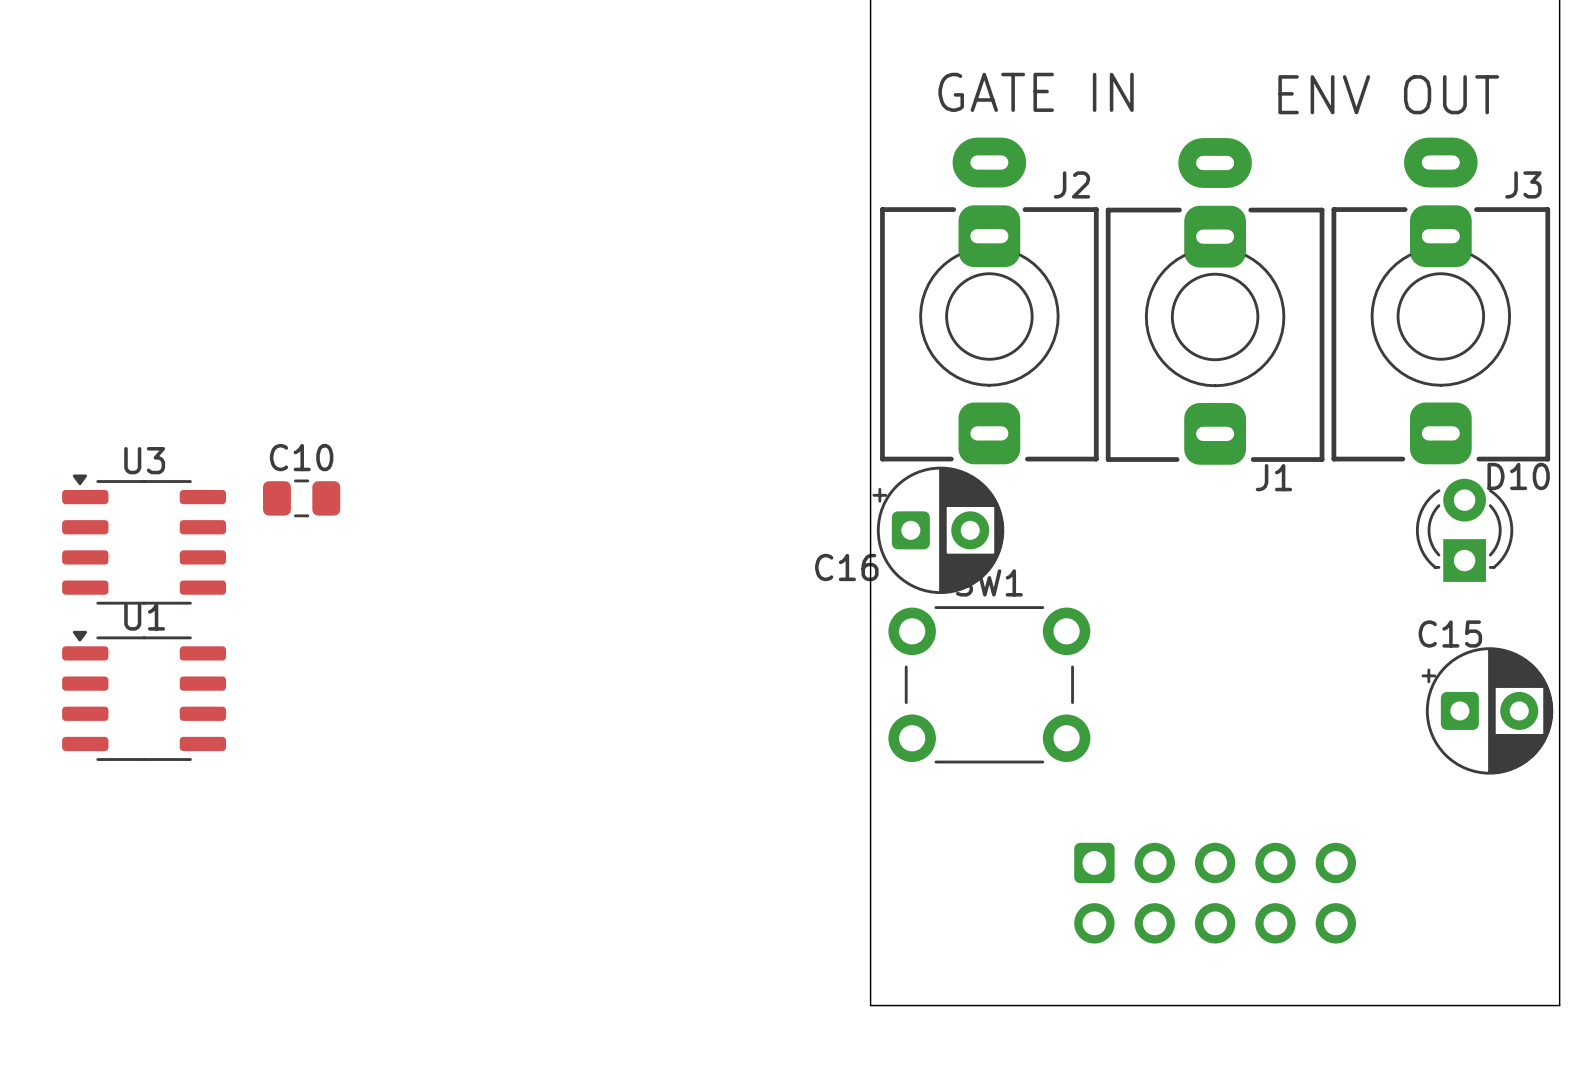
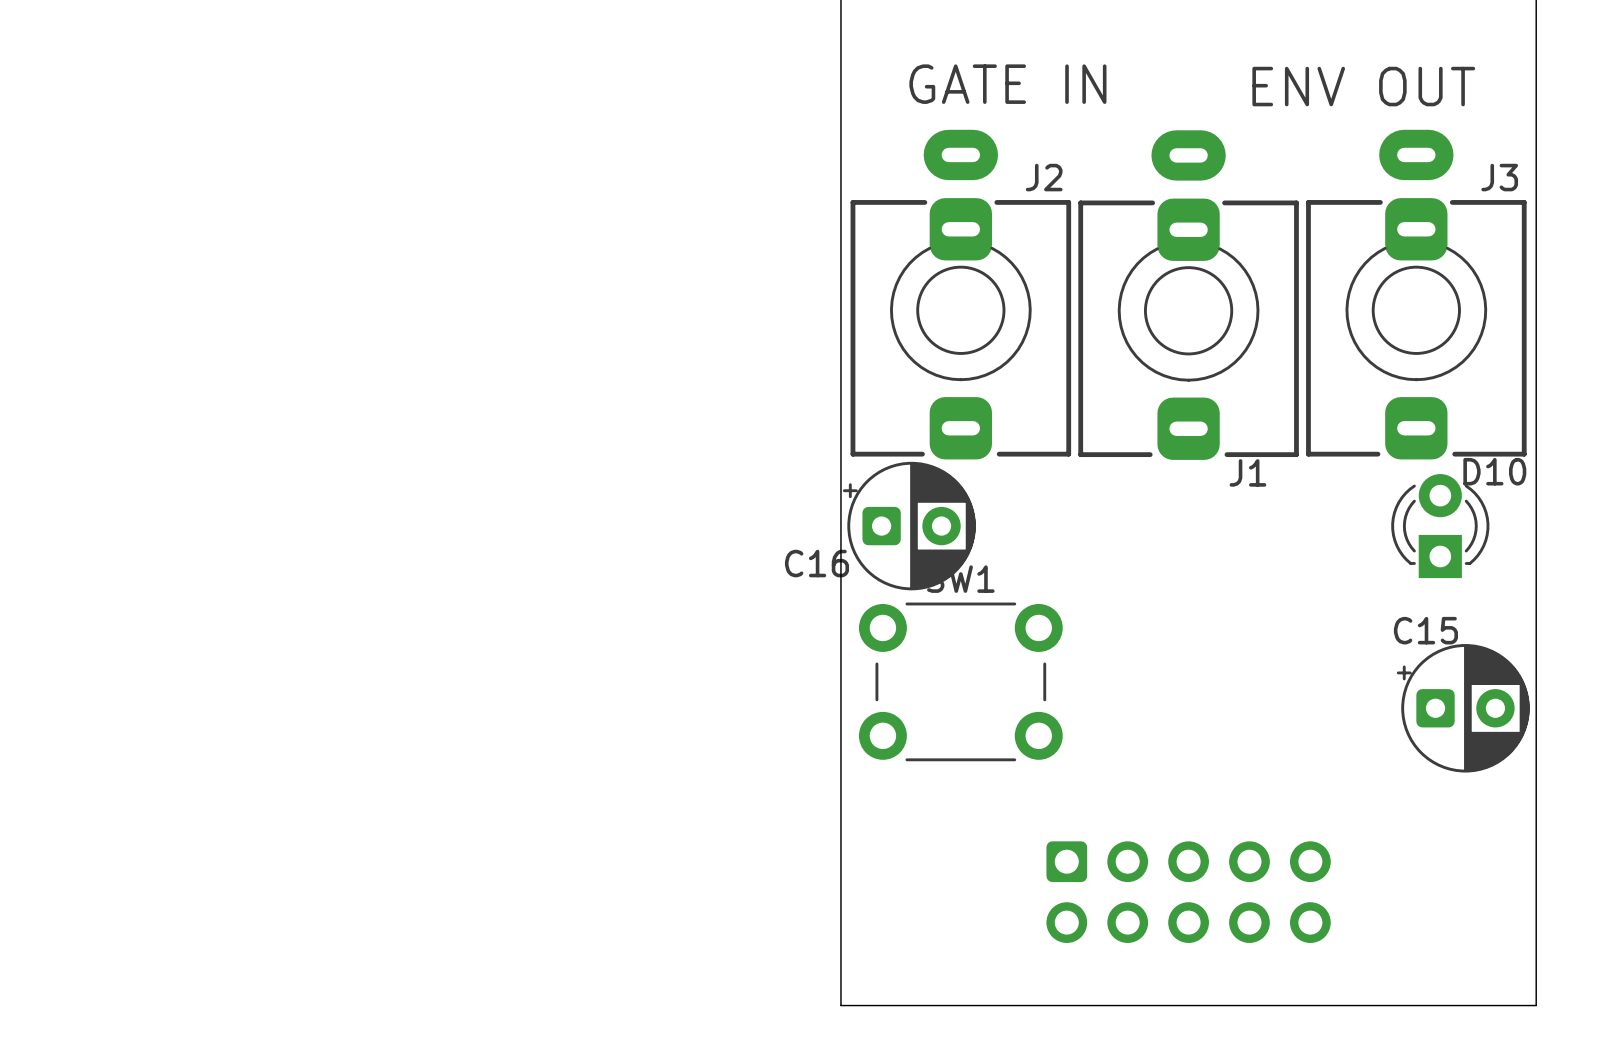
C10: (301, 498) -> none
U3: (144, 539) -> none
U1: (144, 695) -> none

